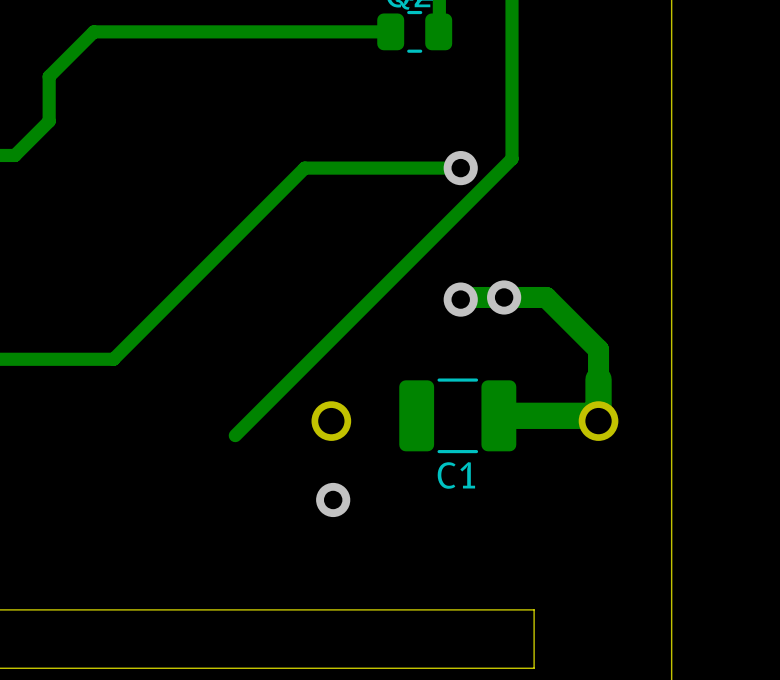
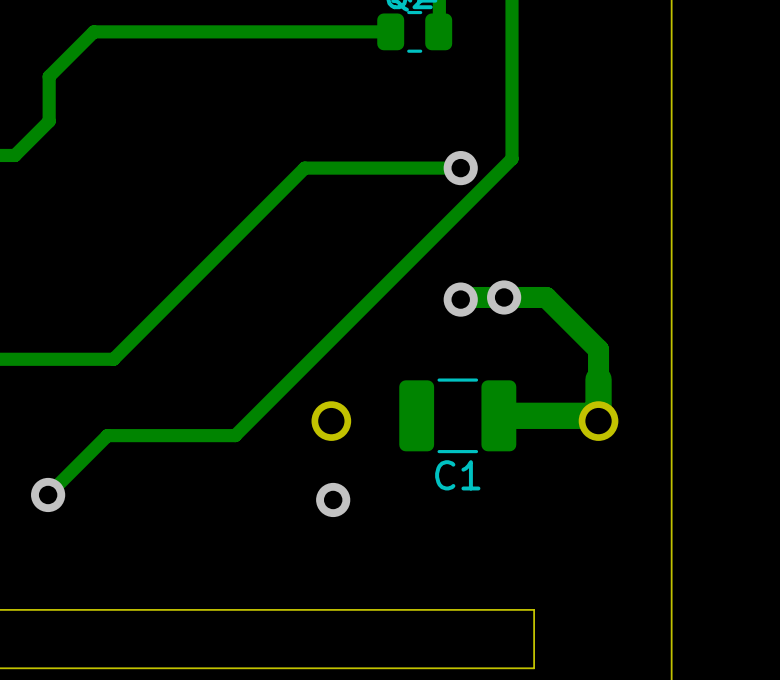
track: none -> (235, 435) (107, 435) (48, 494)
via: none -> (48, 494)

